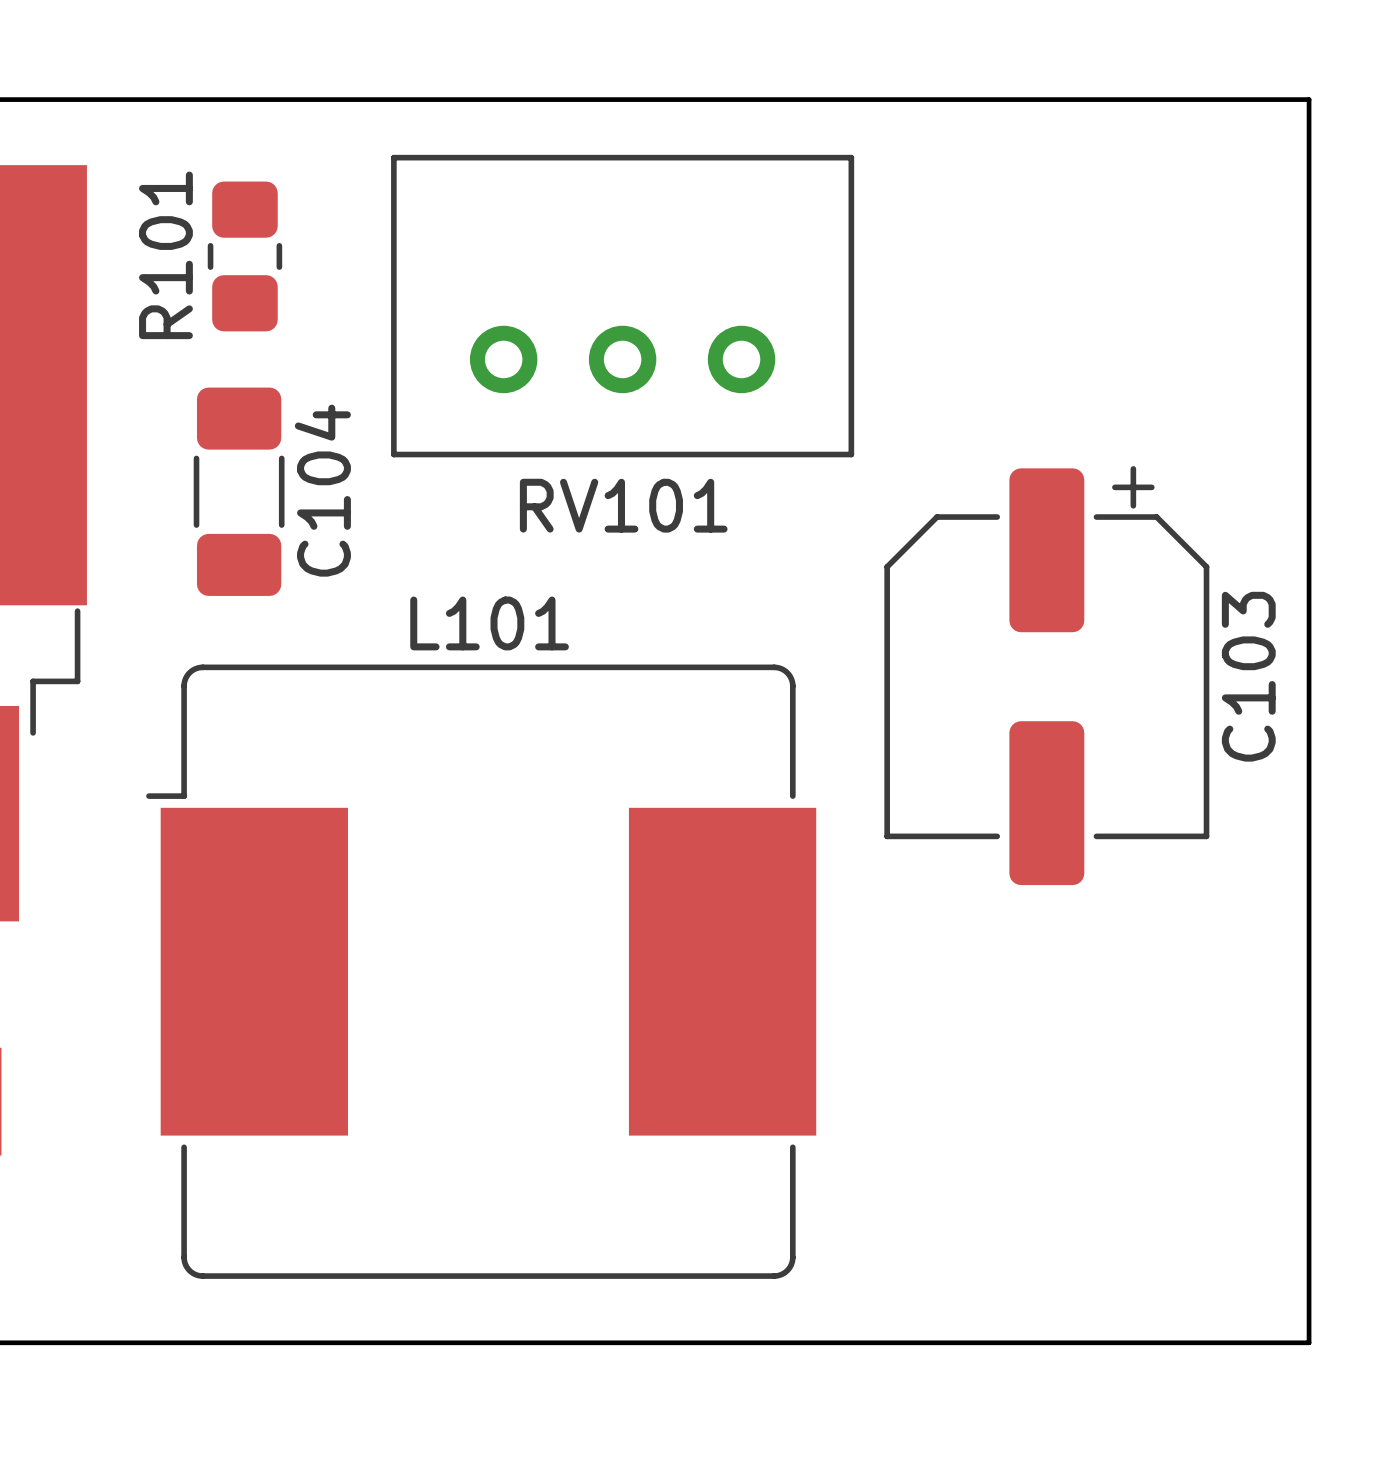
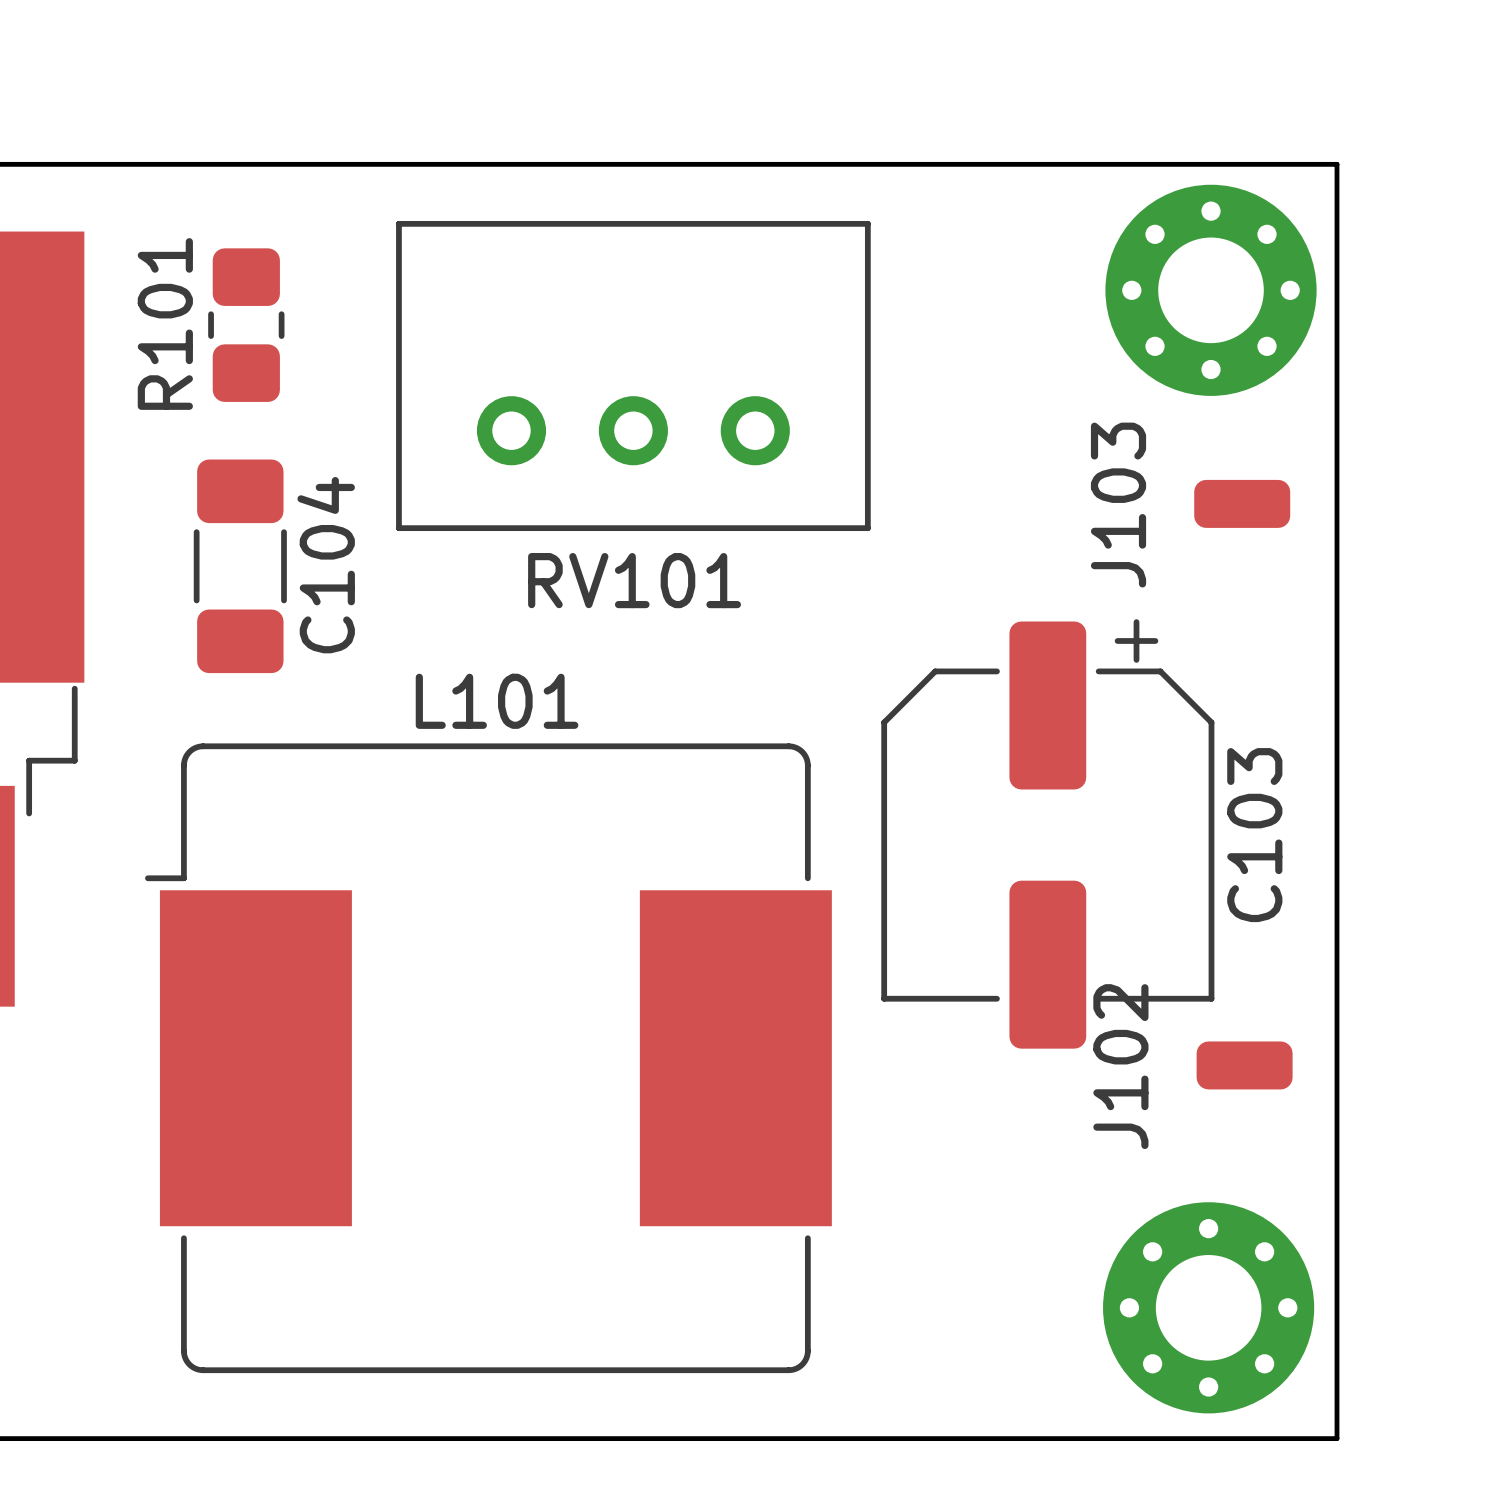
part: none -> (1211, 290)
J103: none -> (1242, 503)
C103 footprint: [884, 466, 1210, 886] -> [881, 619, 1215, 1049]
J102: none -> (1244, 1065)
part: none -> (1208, 1307)

